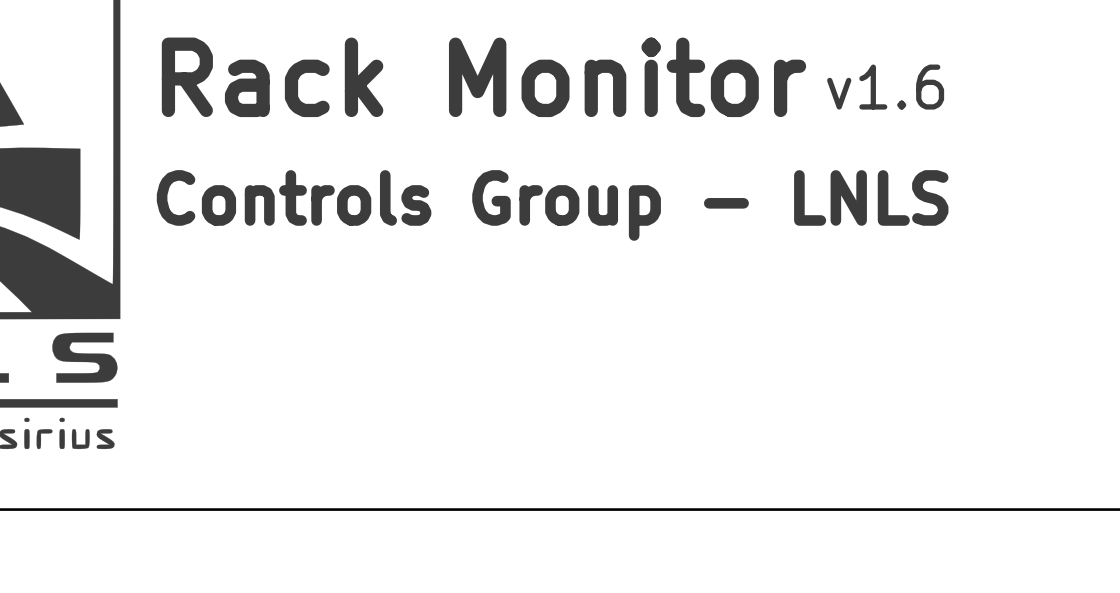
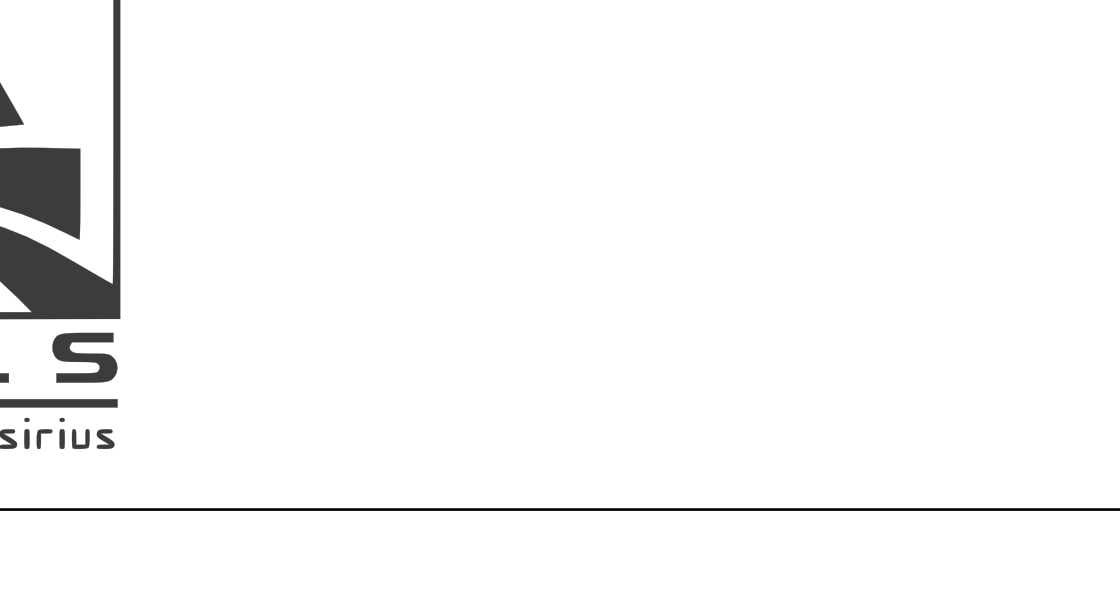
text: Rack Monitor (483, 77) -> none
text: v1.6 (885, 87) -> none
text: Controls Group - LNLS (552, 205) -> none

